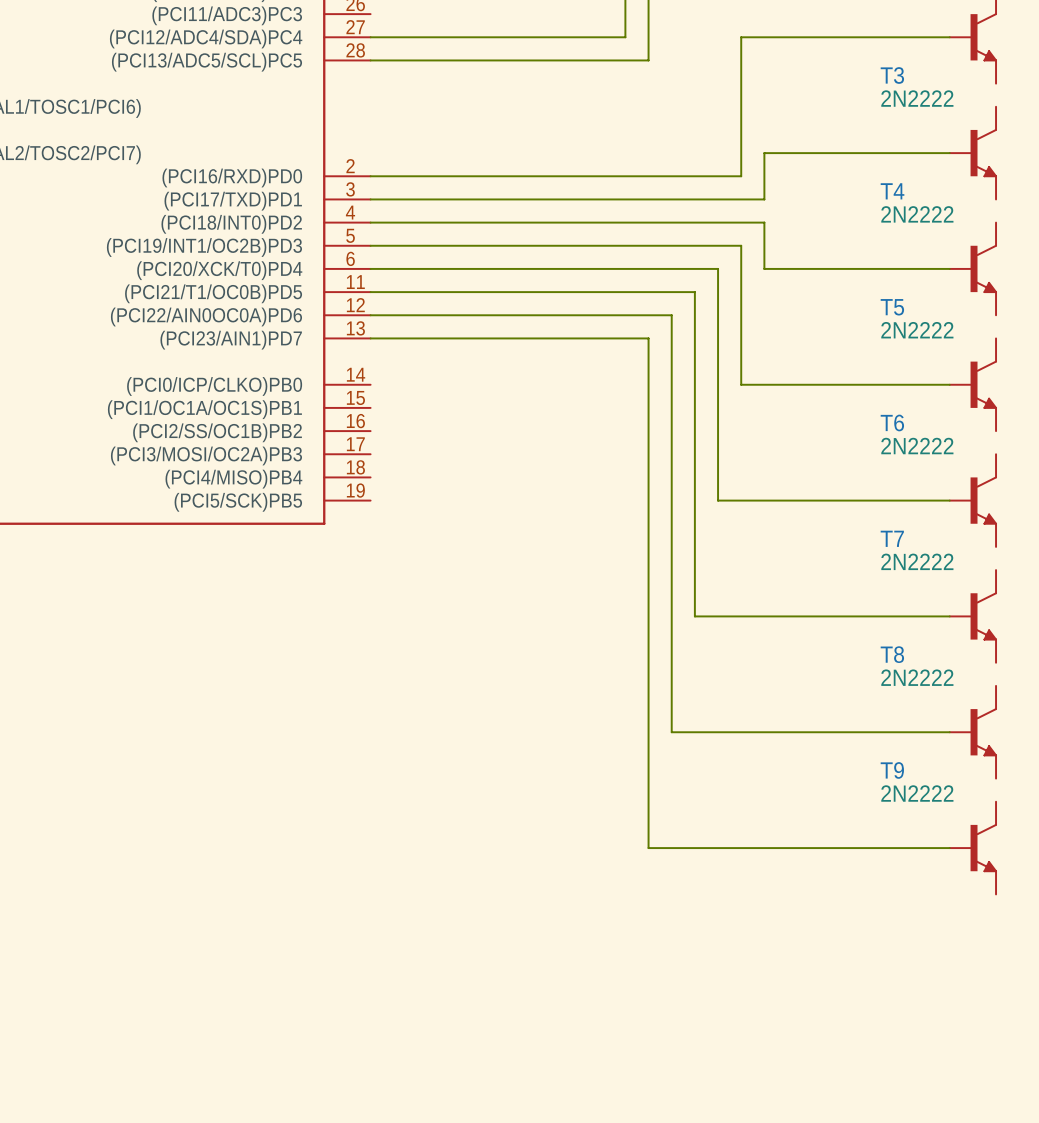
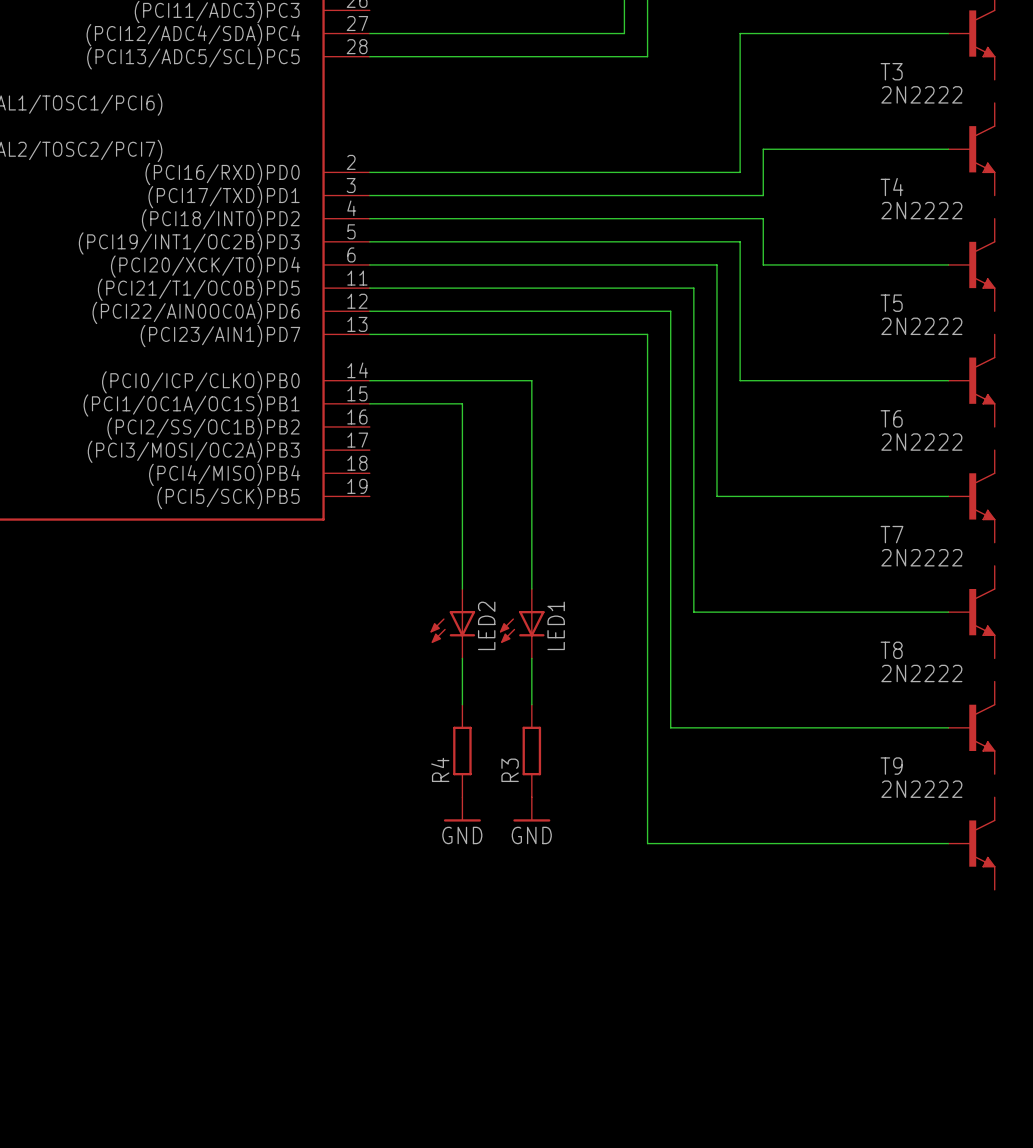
wire: none -> (369, 380) (531, 380) (531, 588)
wire: none -> (369, 403) (462, 403) (462, 588)
LED2: none -> (452, 623)
LED1: none -> (522, 623)
wire: none -> (462, 658) (462, 704)
wire: none -> (531, 658) (531, 704)
R4: none -> (462, 750)
R3: none -> (531, 750)
power symbol: none -> GND (462, 809)
power symbol: none -> GND (531, 809)

